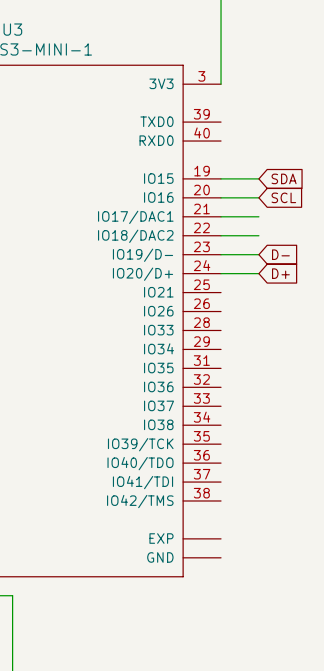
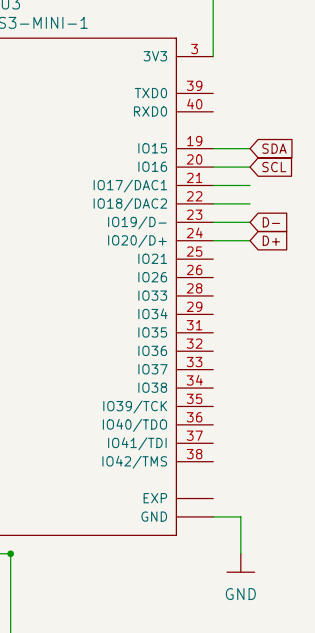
wire: none -> (213, 516) (240, 516) (240, 553)
junction: none -> (10, 553)
power symbol: none -> GND (240, 562)

